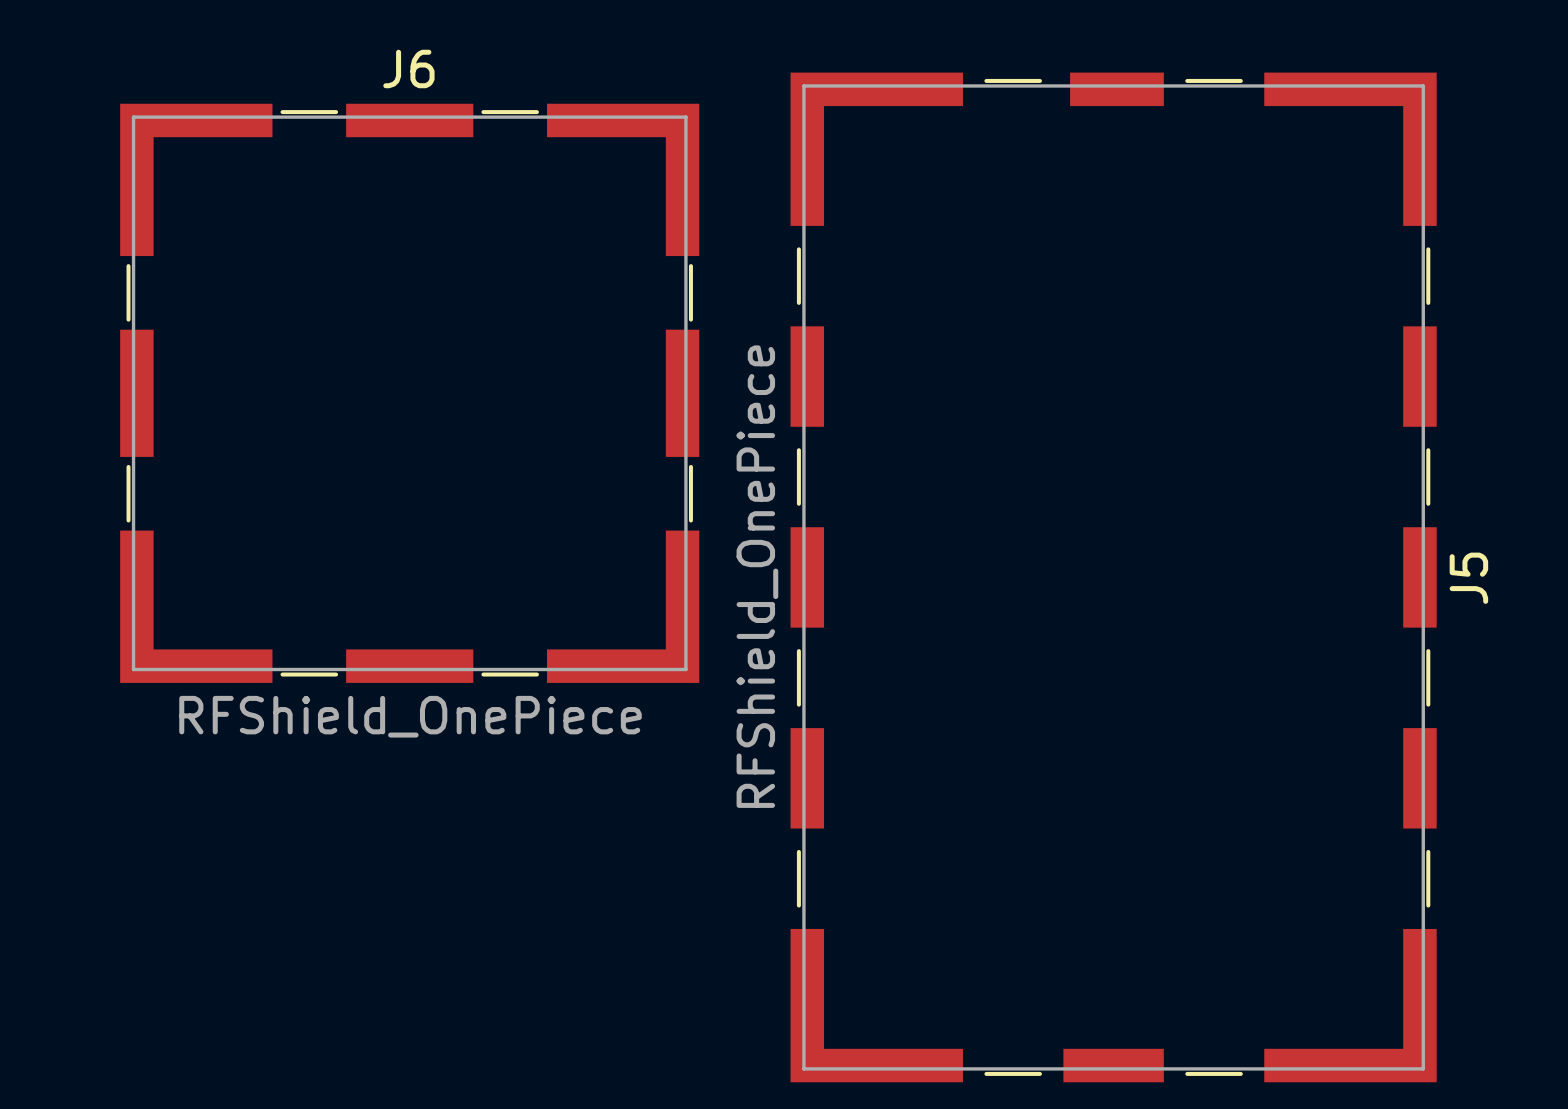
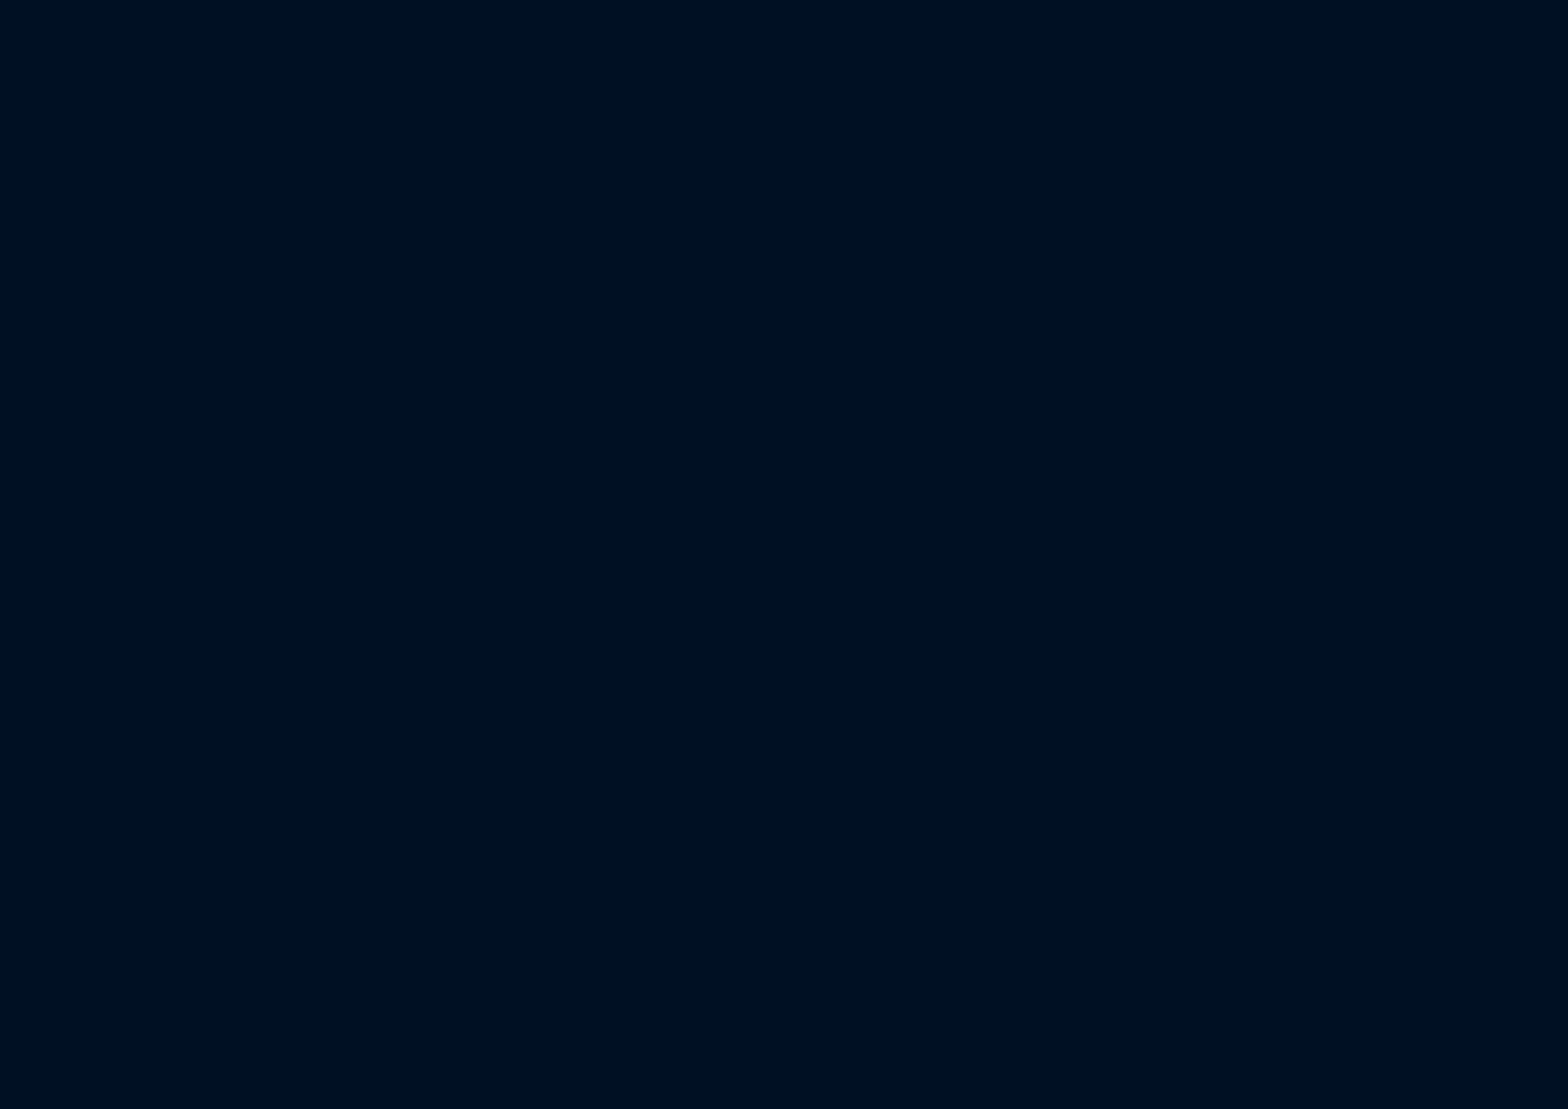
J6: RFShield_OnePiece (409, 393) -> none
J5: RFShield_OnePiece (1113, 577) -> none

